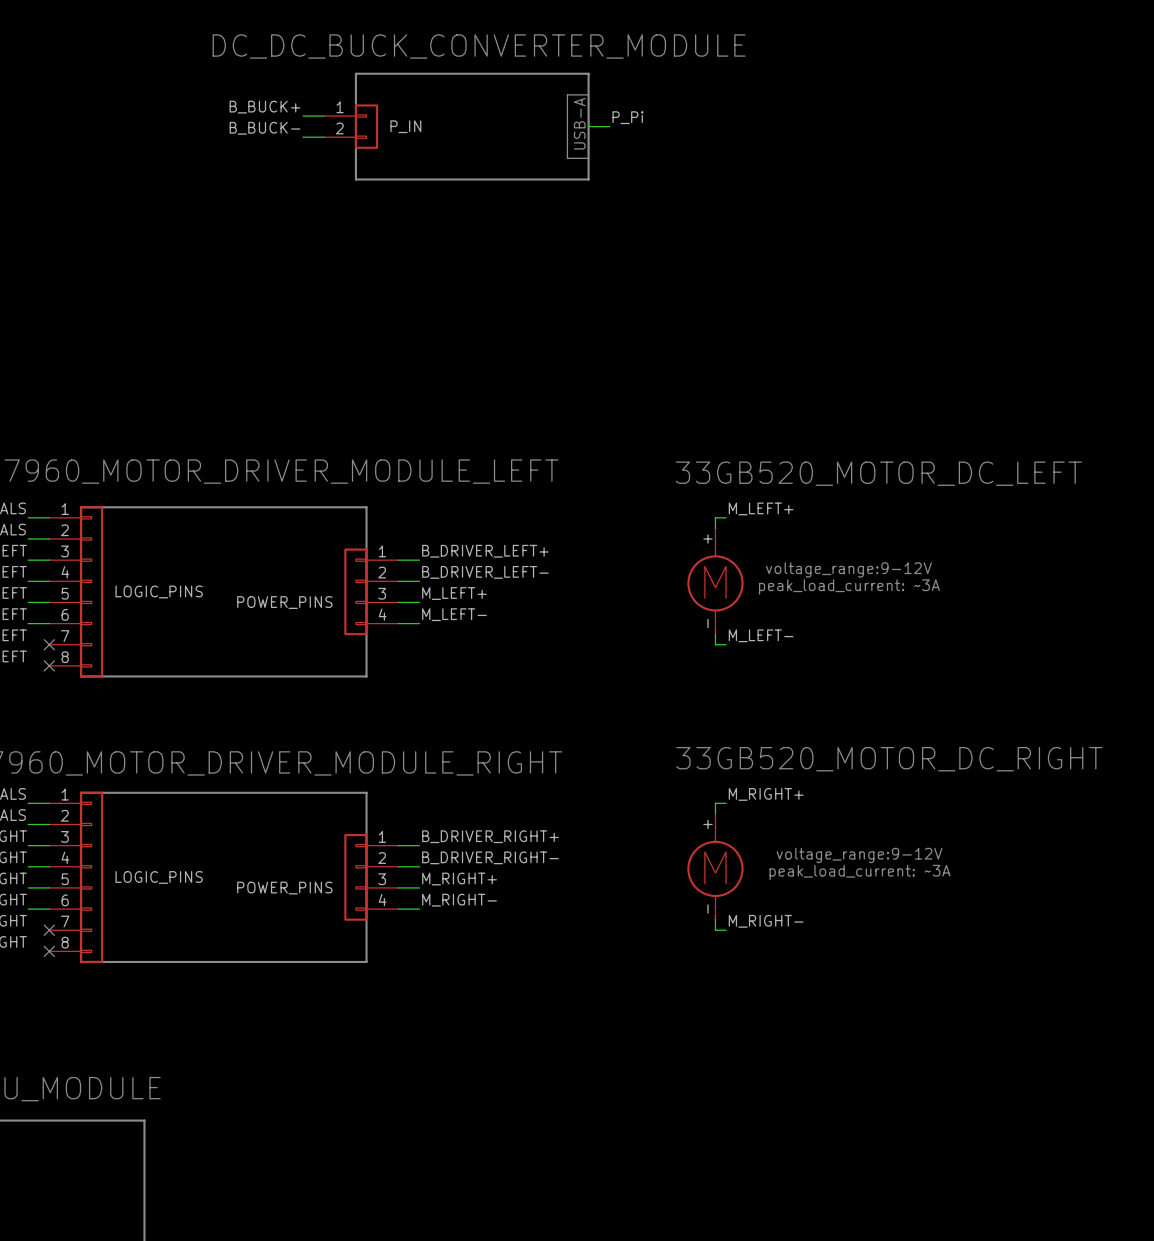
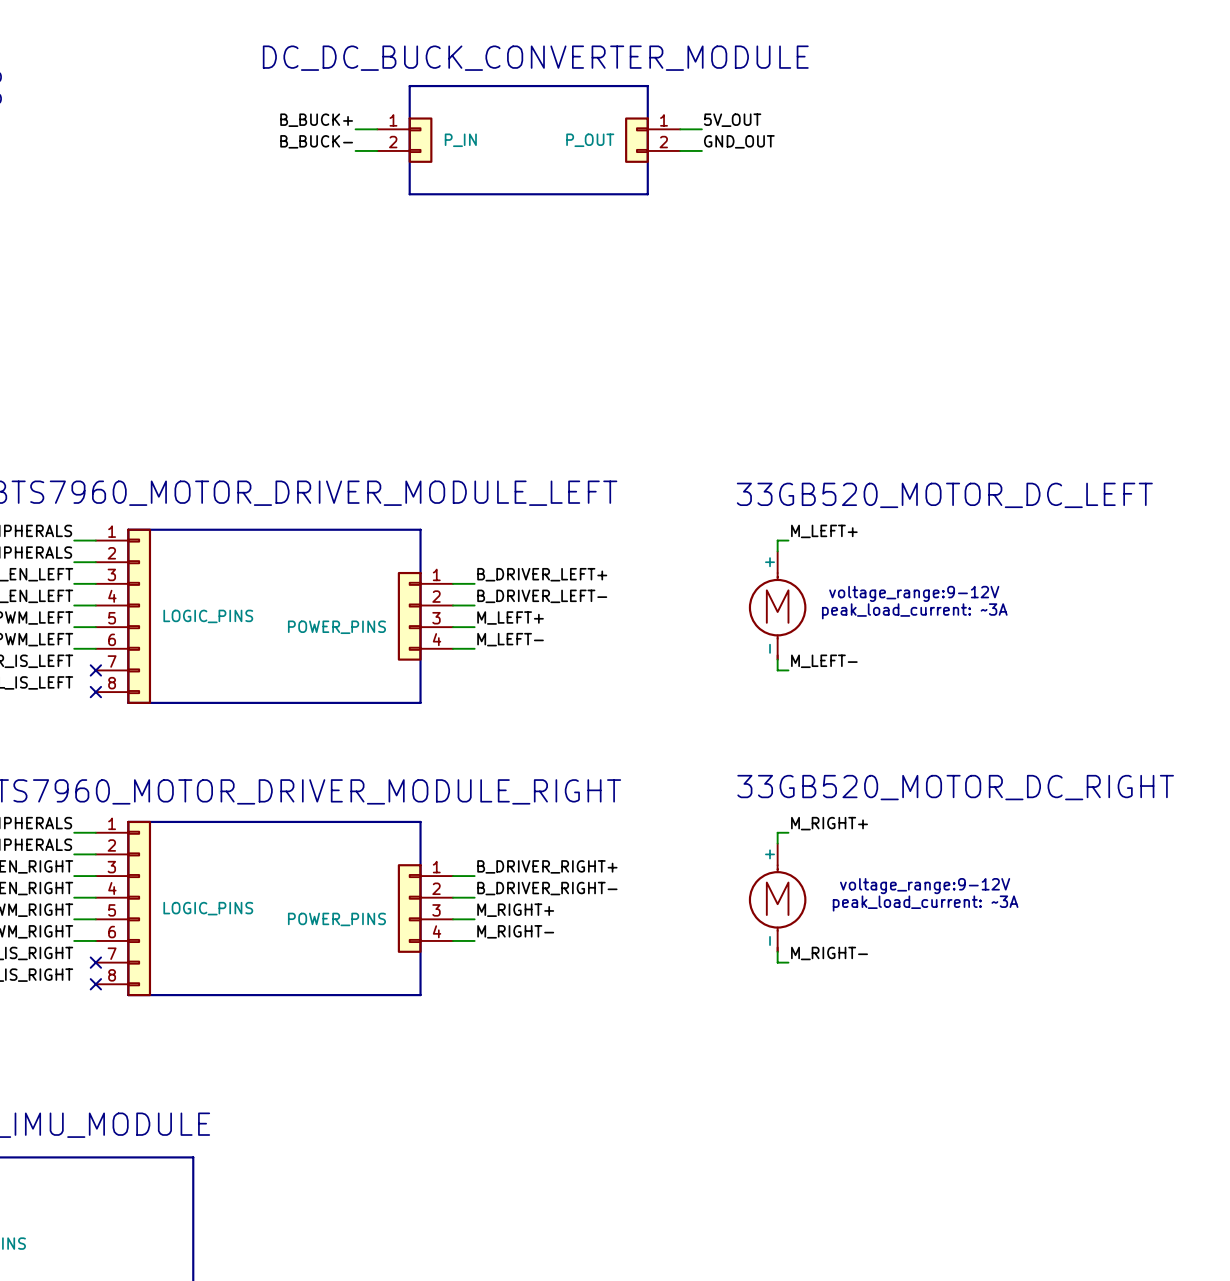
line: (567, 94) (588, 94) (588, 158) (567, 158) (567, 94) -> none
label: none -> 5V_OUT (732, 120)
label: P_Pi (627, 117) -> none
text: USB-A (579, 123) -> none
wire: (588, 126) (609, 126) -> (680, 129) (701, 129)
part: none -> P_OUT (652, 140)
label: none -> GND_OUT (739, 141)
wire: none -> (680, 150) (701, 150)

